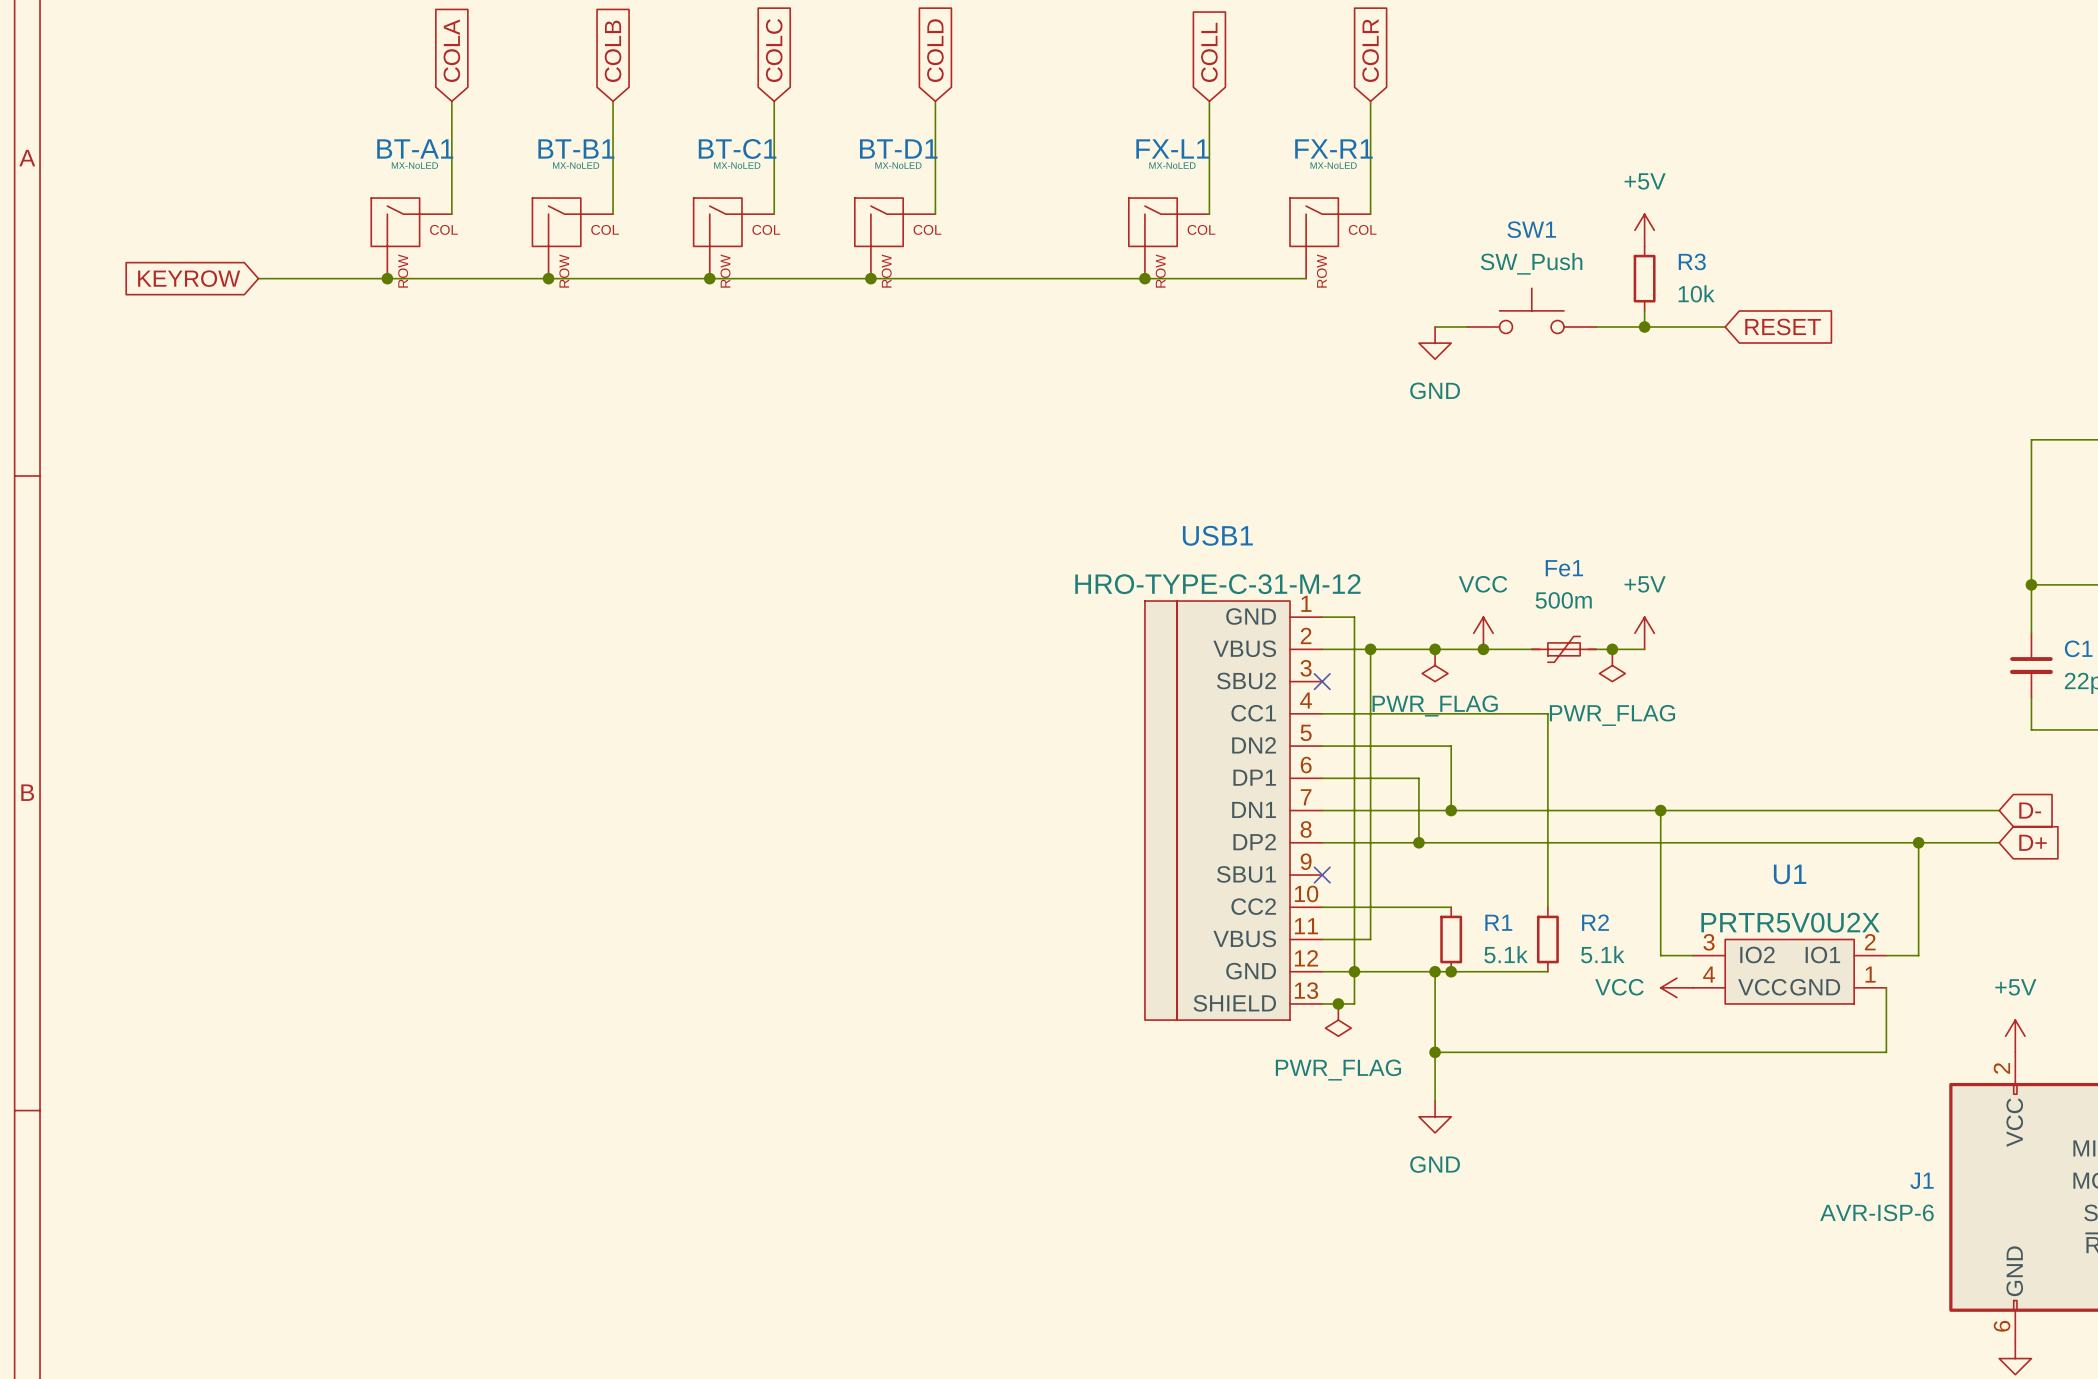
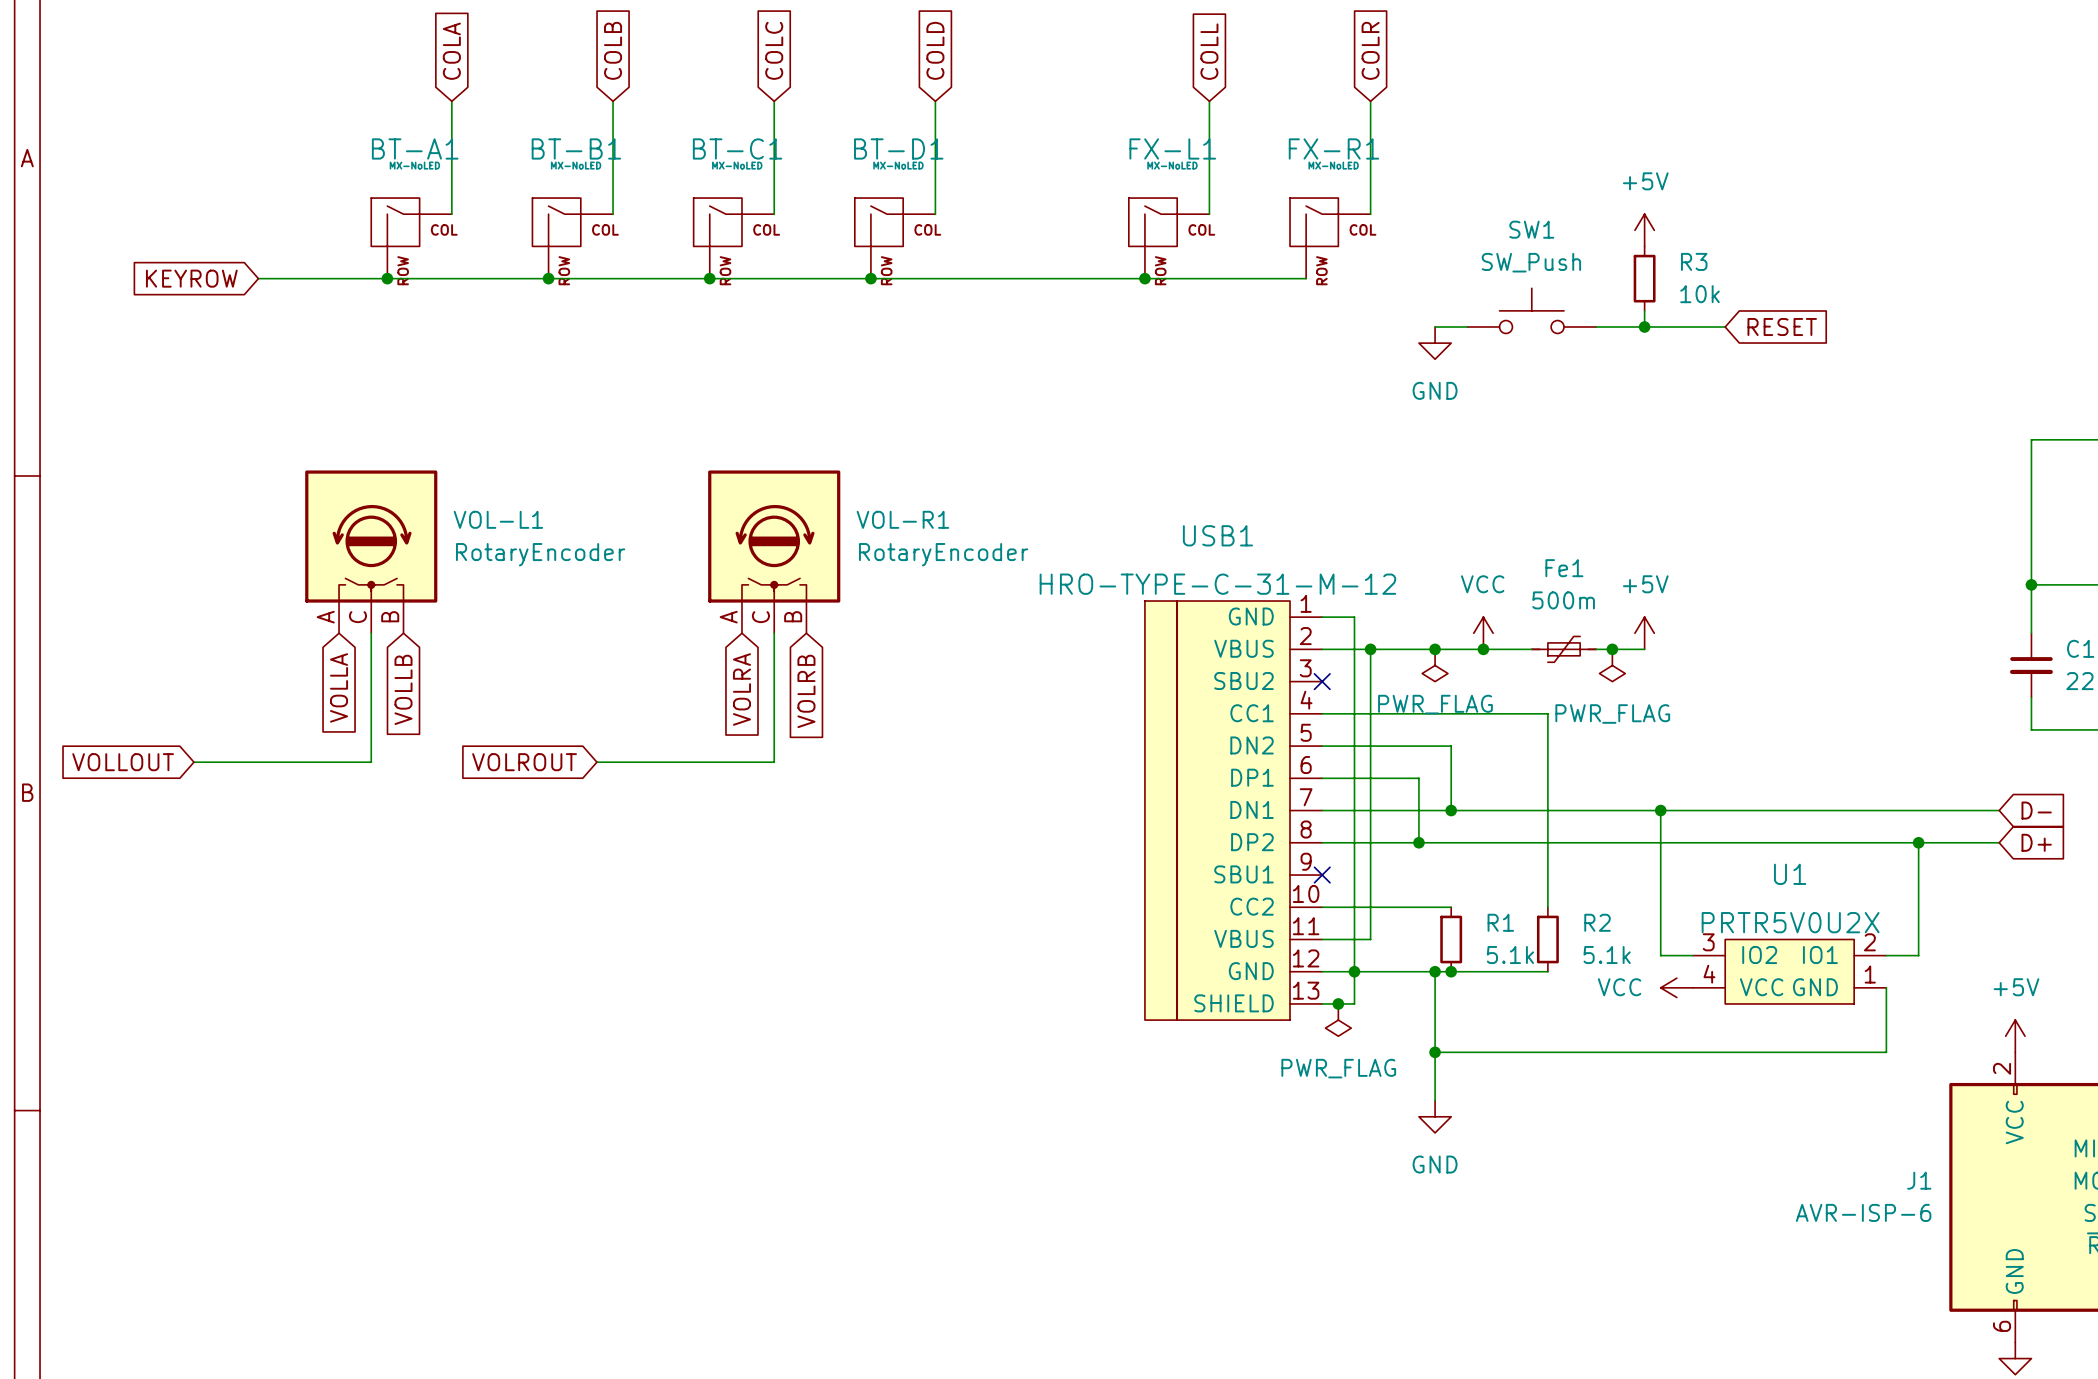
VOL-L1: none -> RotaryEncoder (371, 551)
VOL-R1: none -> RotaryEncoder (774, 551)
wire: none -> (371, 633) (371, 762) (193, 762)
wire: none -> (774, 633) (774, 762) (596, 762)
global label: none -> VOLLA (339, 687)
global label: none -> VOLLB (403, 689)
global label: none -> VOLRA (741, 689)
global label: none -> VOLRB (806, 691)
global label: none -> VOLLOUT (123, 762)
global label: none -> VOLROUT (524, 762)

